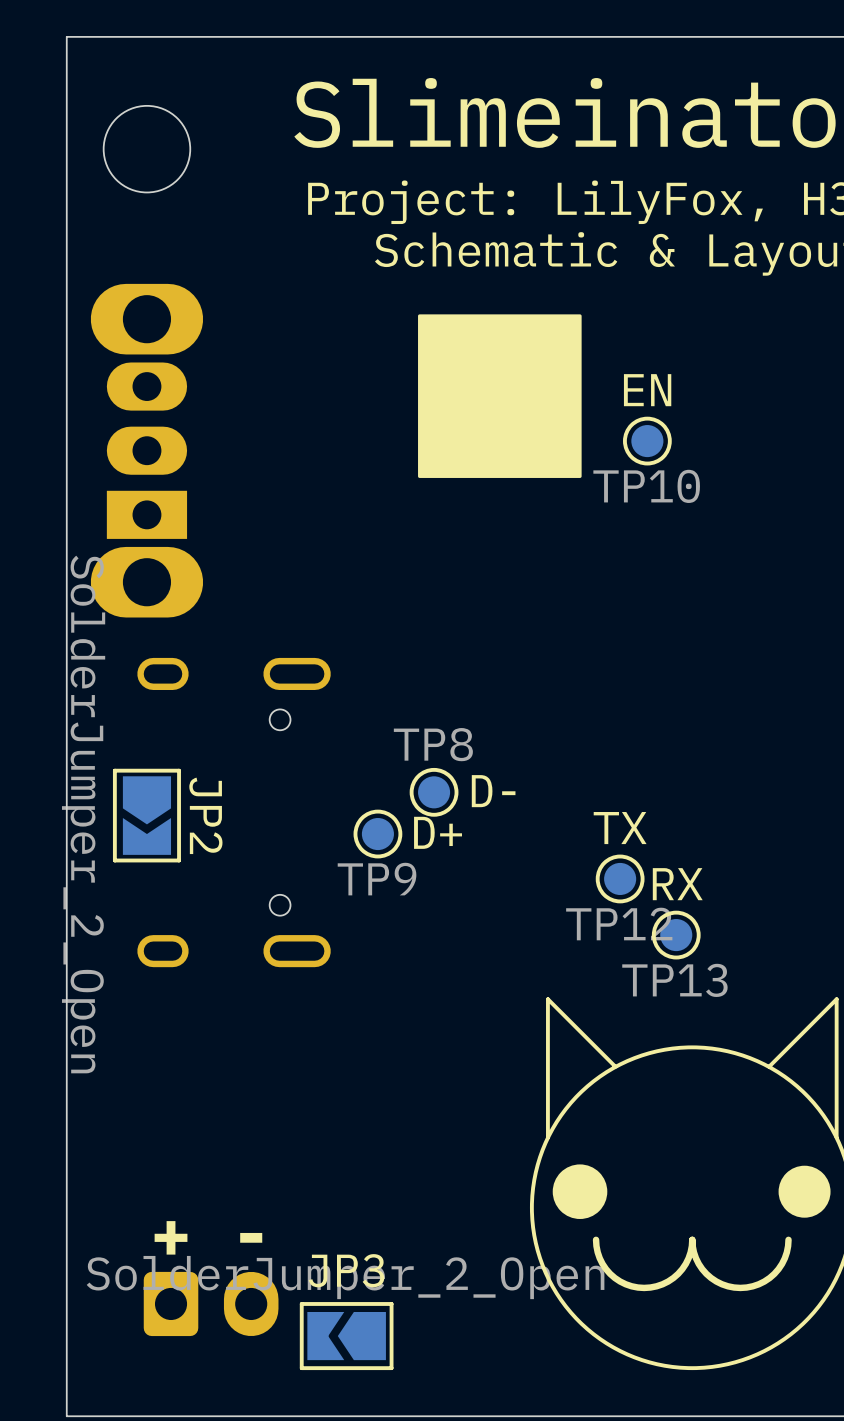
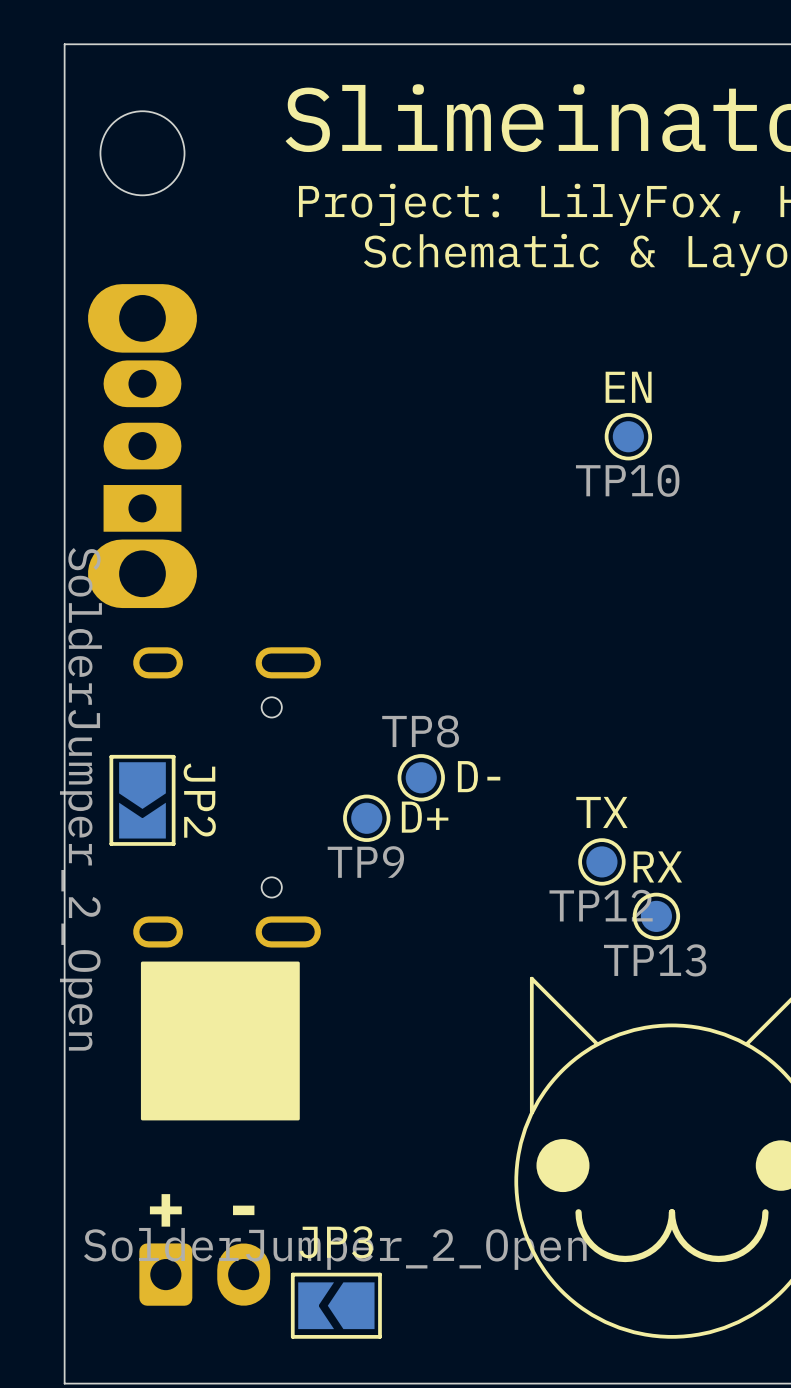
drawing position: (499, 396) -> (220, 1040)

